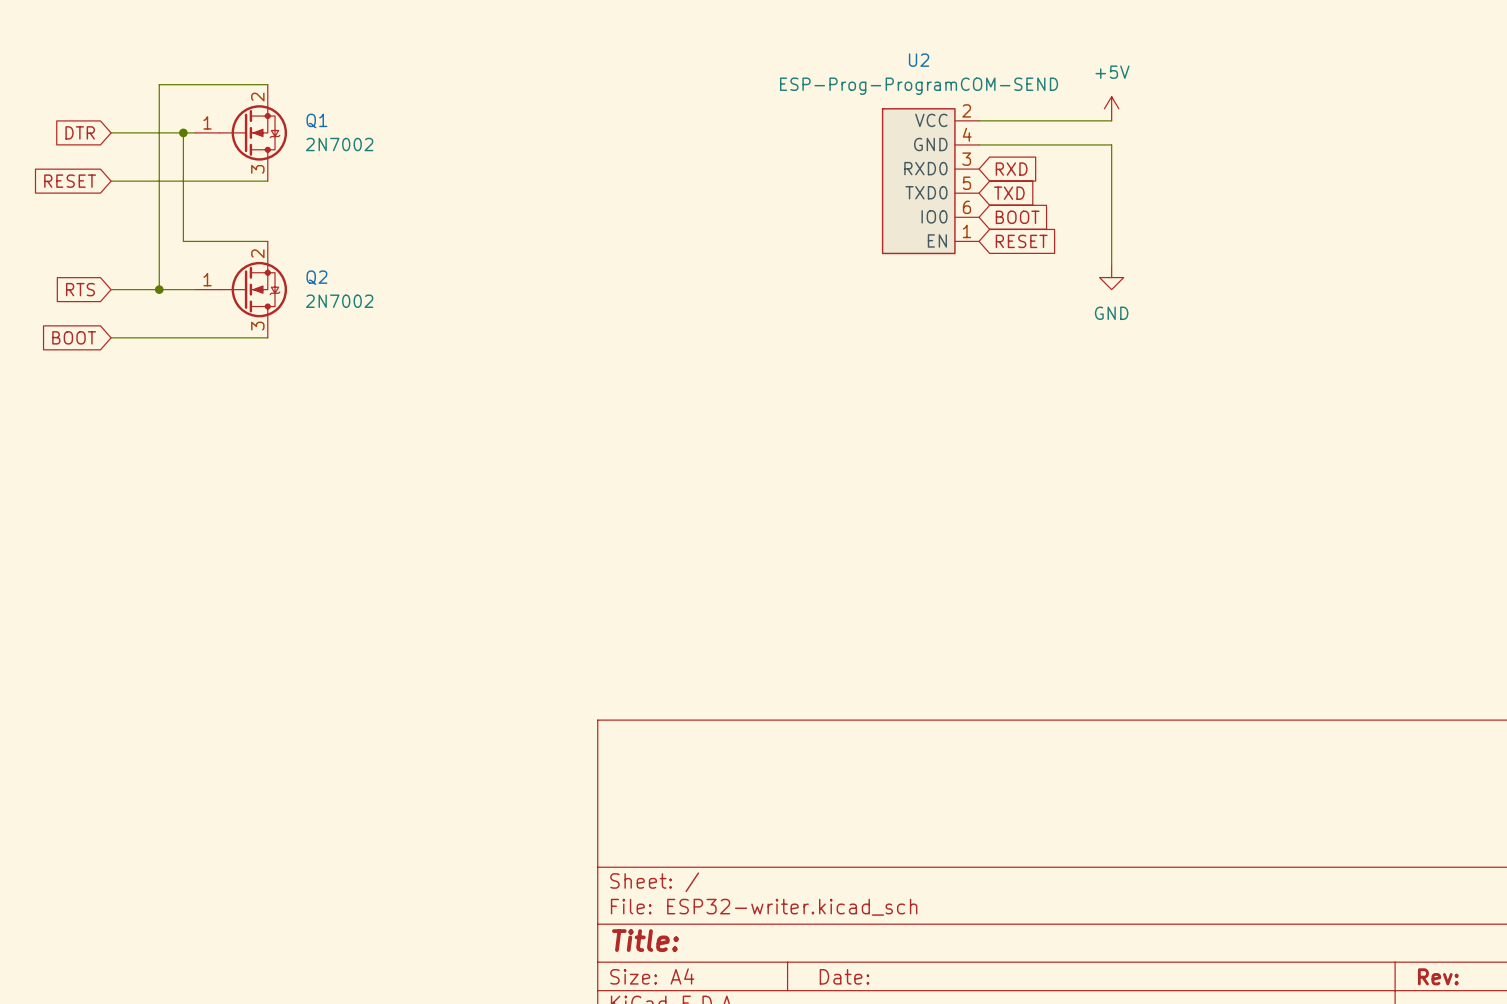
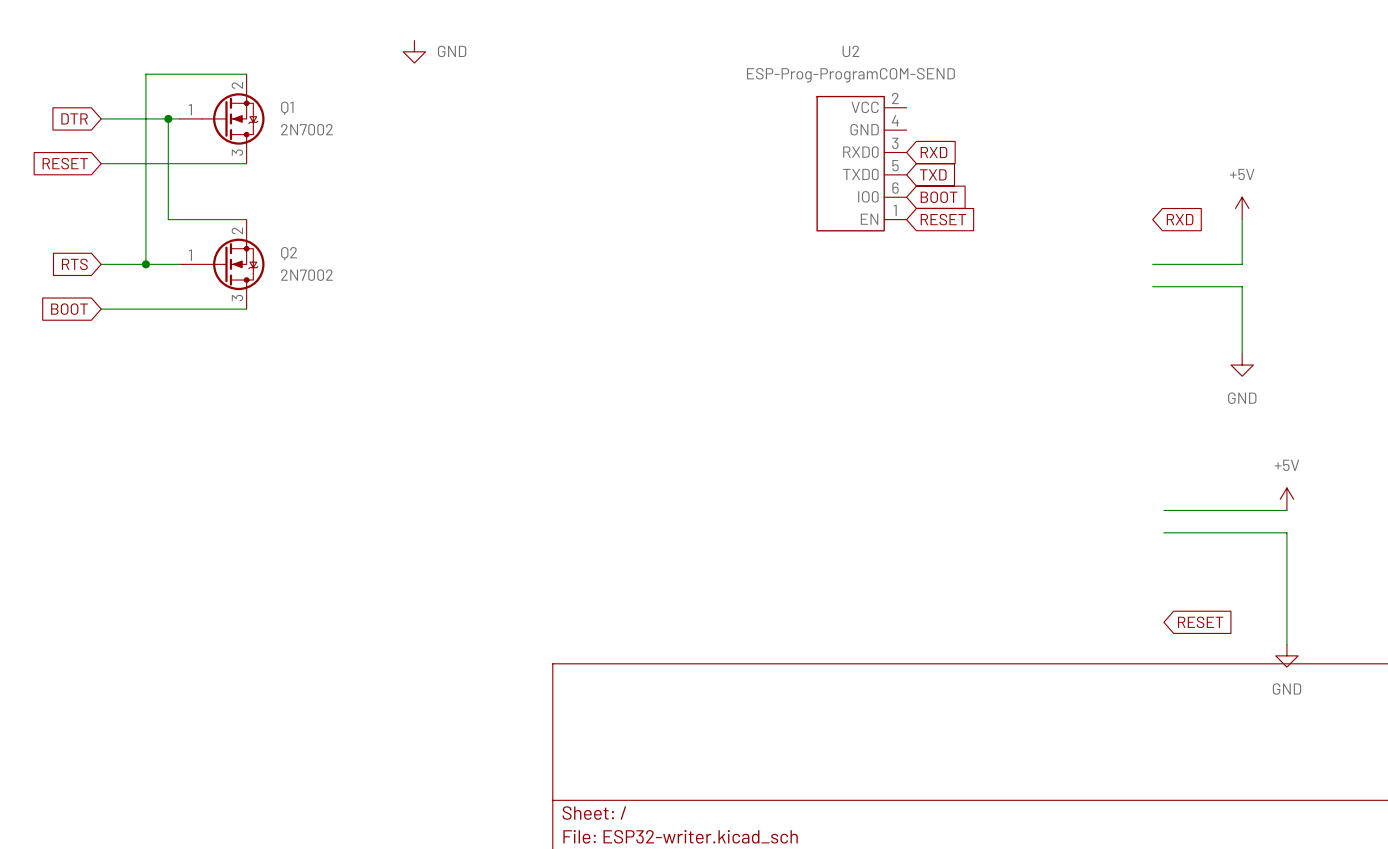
power symbol: none -> GND (414, 51)
power symbol: +5V (1111, 108) -> none
wire: (979, 120) (1111, 120) -> none
wire: (979, 144) (1111, 144) (1111, 265) -> none
power symbol: none -> +5V (1242, 208)
global label: none -> RXD (1180, 219)
wire: none -> (1242, 219) (1242, 264) (1152, 264)
power symbol: GND (1111, 277) -> none
wire: none -> (1152, 286) (1242, 286) (1242, 353)
power symbol: none -> GND (1242, 365)
power symbol: none -> +5V (1286, 499)
wire: none -> (1163, 510) (1286, 510)
wire: none -> (1163, 532) (1286, 532) (1286, 644)
global label: none -> RESET (1200, 622)
power symbol: none -> GND (1286, 655)

